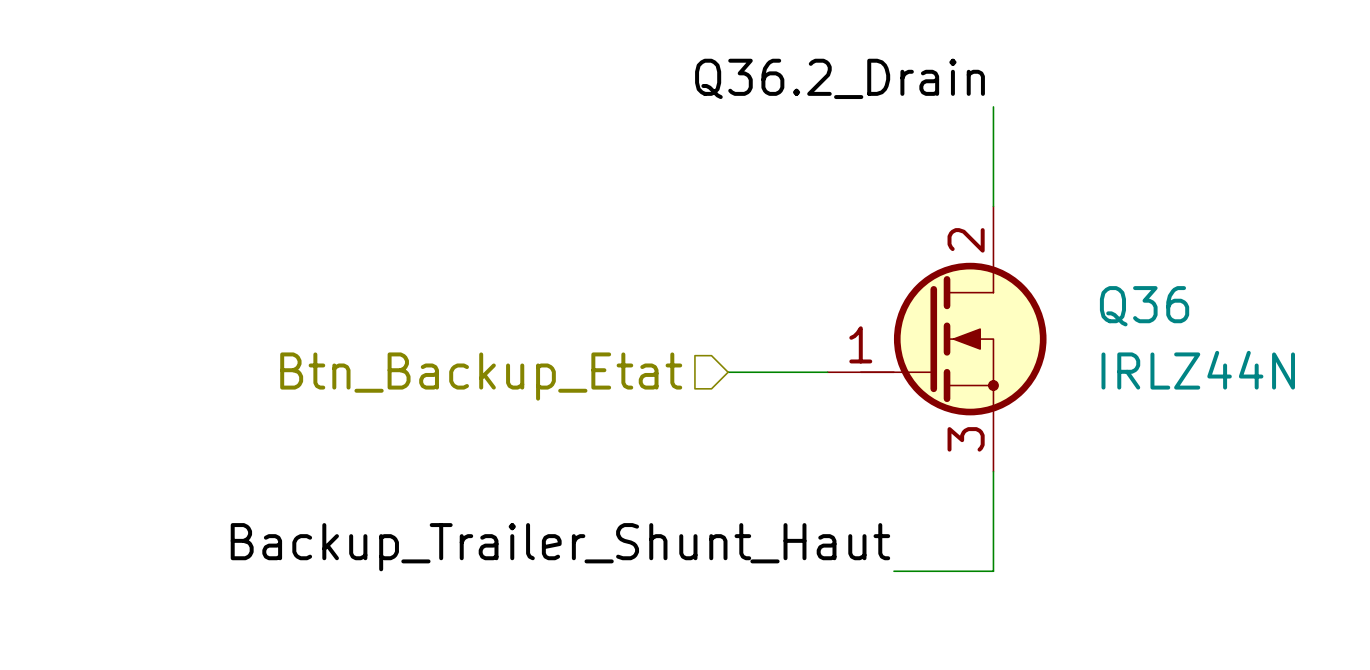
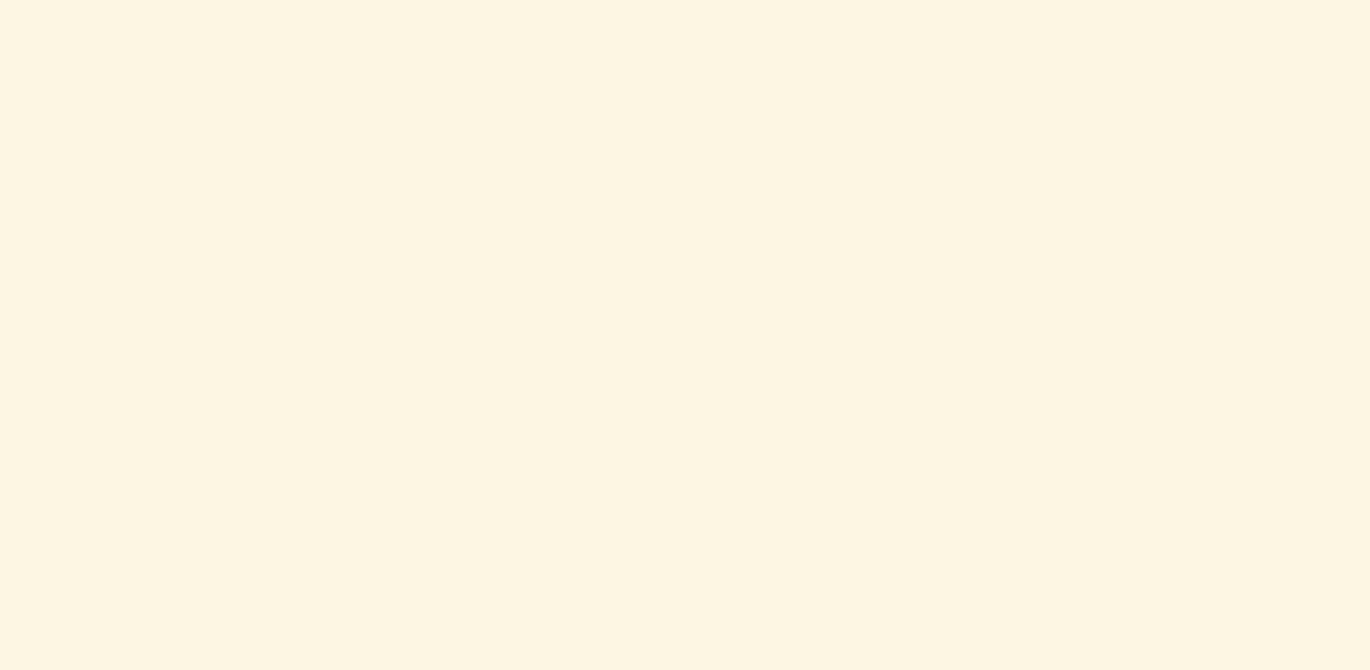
label: Q36.2_Drain (840, 78) -> none
wire: (993, 106) (993, 206) -> none
Q36: IRLZ44N (937, 339) -> none
wire: (728, 372) (827, 372) -> none
hierarchical label: Btn_Backup_Etat (481, 376) -> none
wire: (993, 471) (993, 571) (893, 571) -> none
label: Backup_Trailer_Shunt_Haut (560, 547) -> none

